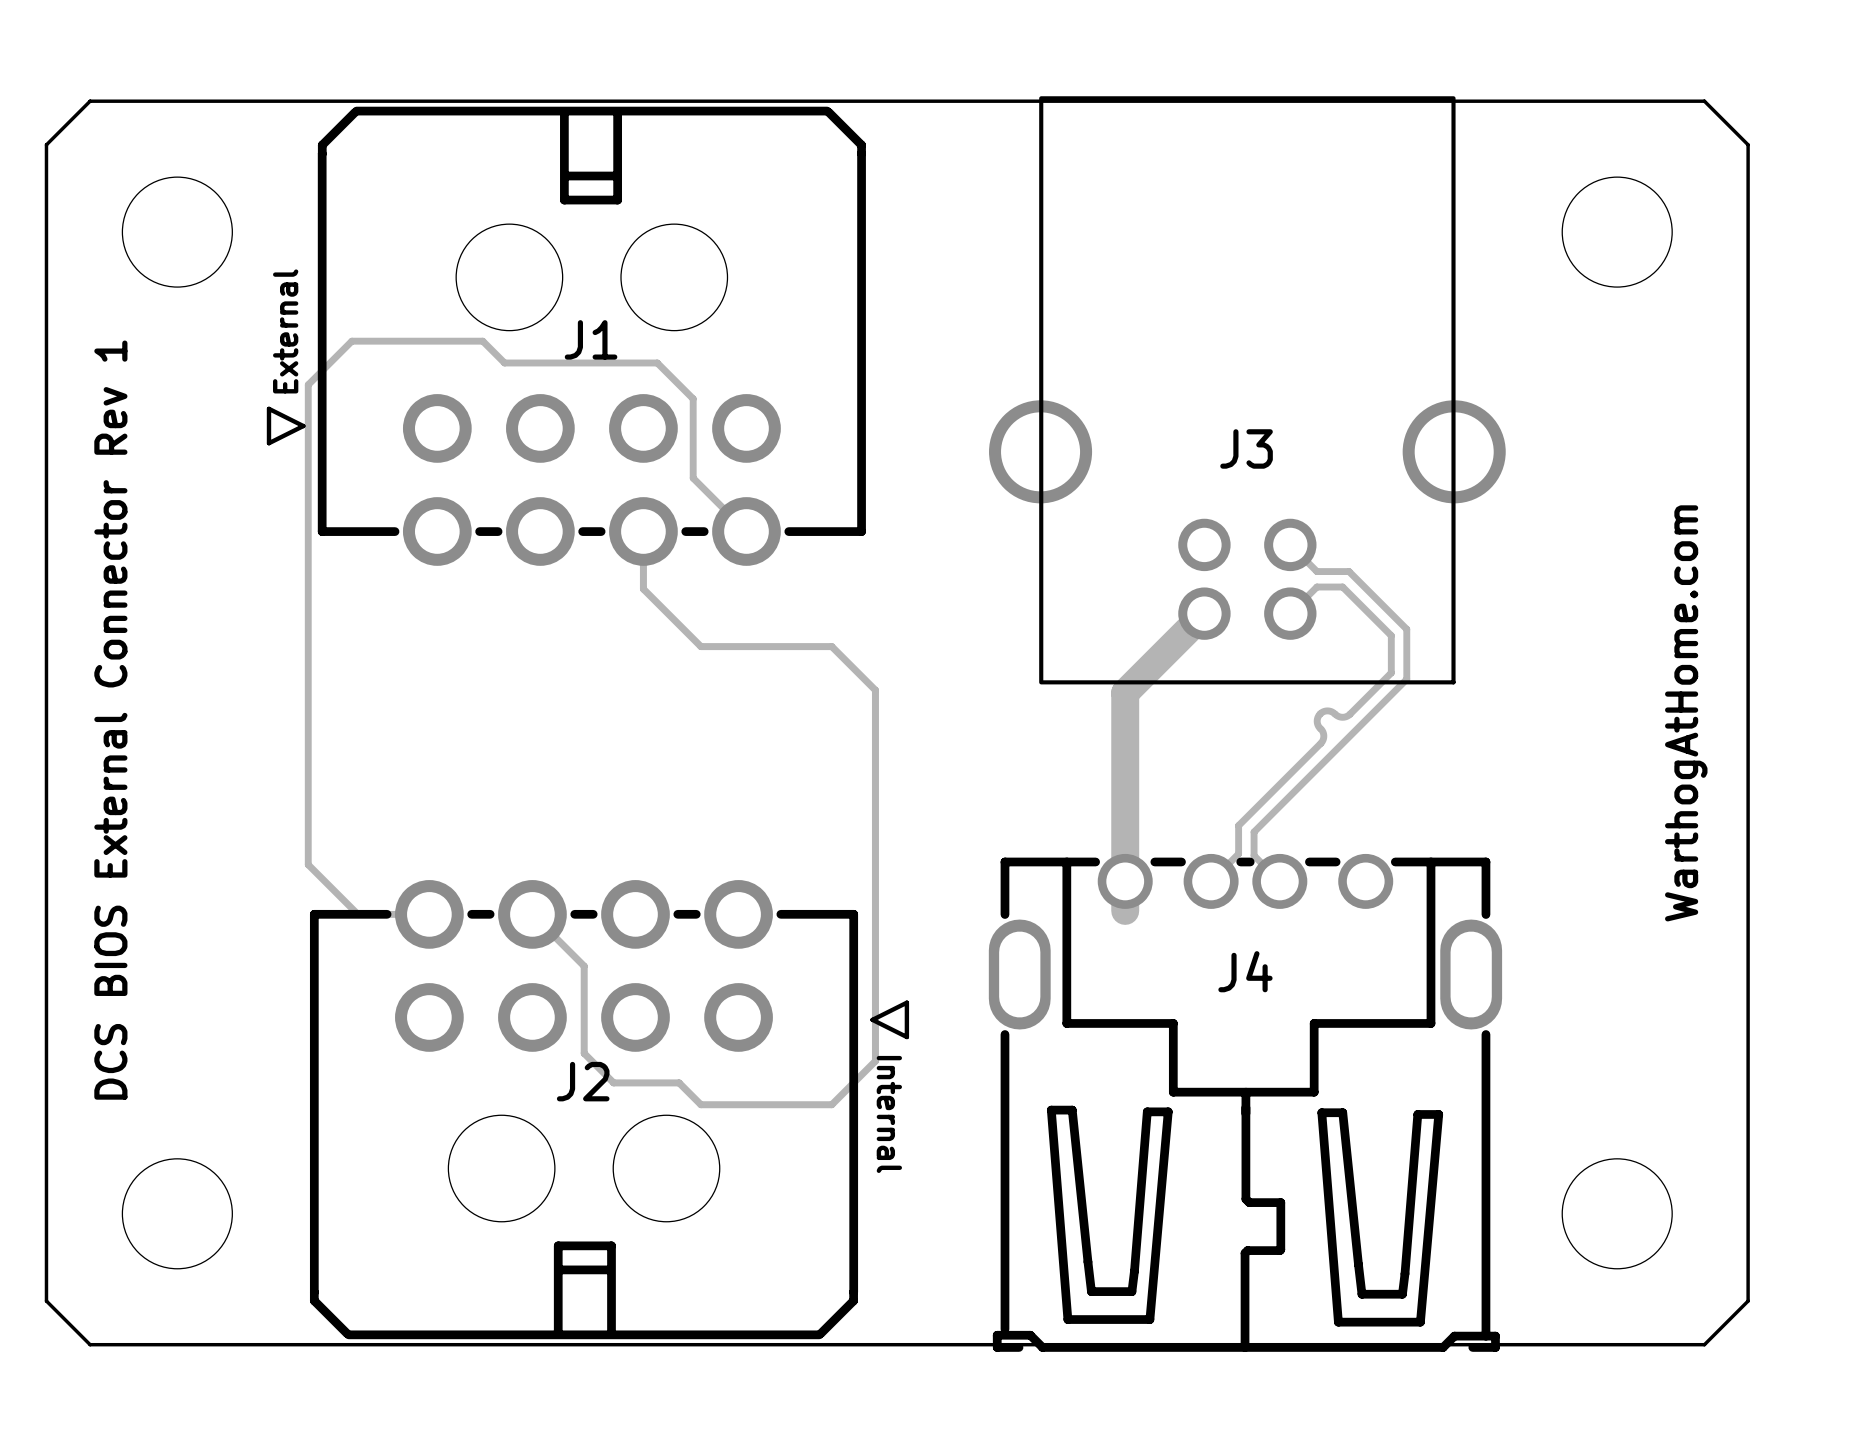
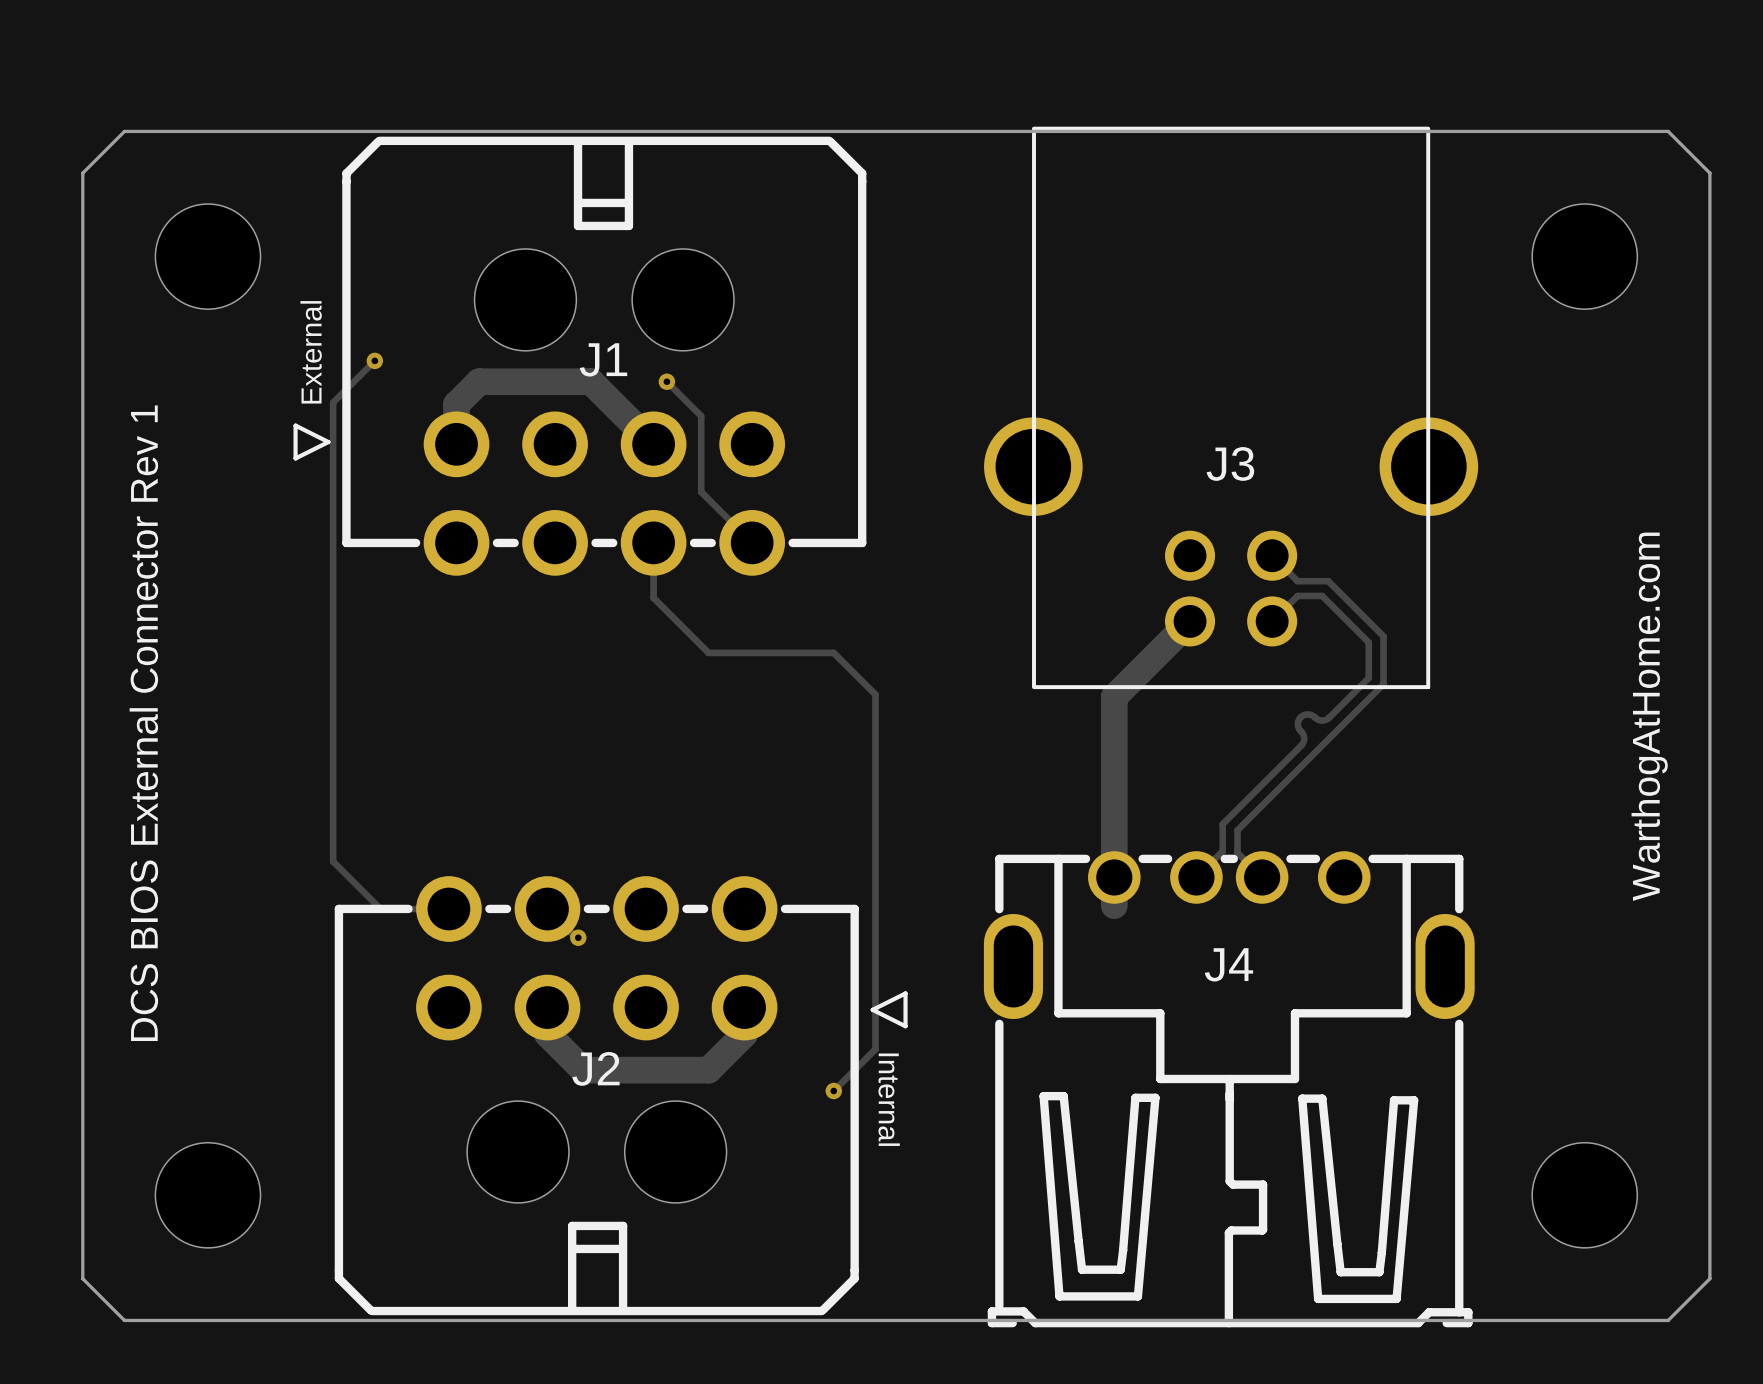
track: (351, 341) (482, 341) (504, 362) -> (456, 444) (456, 404) (479, 381) (520, 381)
via: none -> (374, 360)
track width: thin (504, 362) (577, 362) -> thick (520, 381) (591, 381)
track: (577, 362) (657, 362) -> (591, 381) (653, 444)
via: none -> (666, 381)
track: (562, 944) (584, 966) (584, 1053) (613, 1082) -> (547, 1007) (547, 1034) (583, 1070) (625, 1070)
via: none -> (578, 937)
track width: thin (613, 1082) (679, 1082) -> thick (625, 1070) (687, 1070)
track: (679, 1082) (700, 1104) (831, 1104) -> (687, 1070) (708, 1070) (744, 1034) (744, 1007)
via: none -> (833, 1091)

